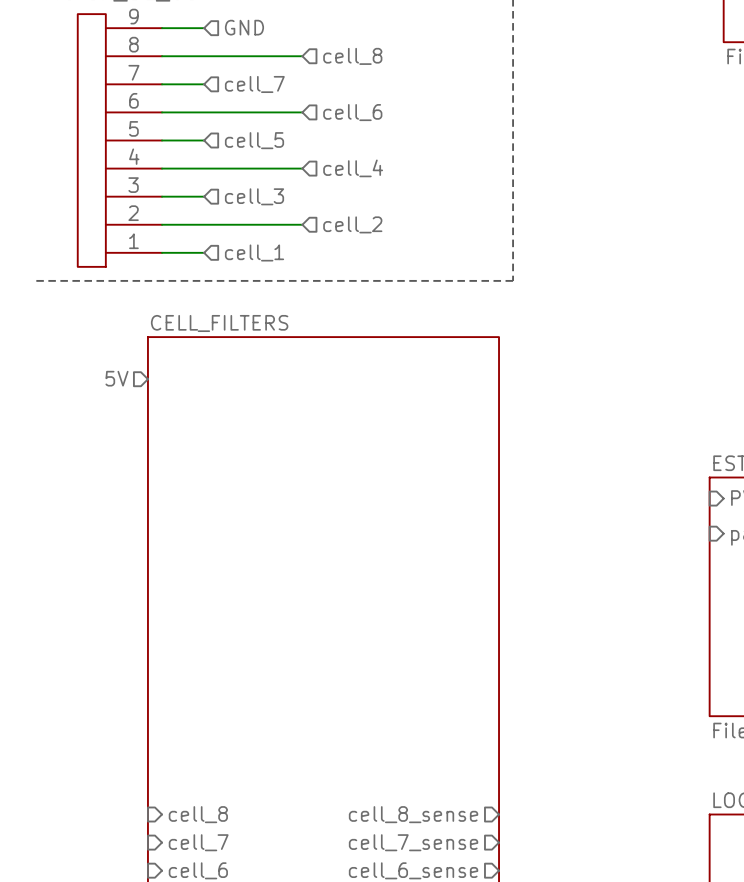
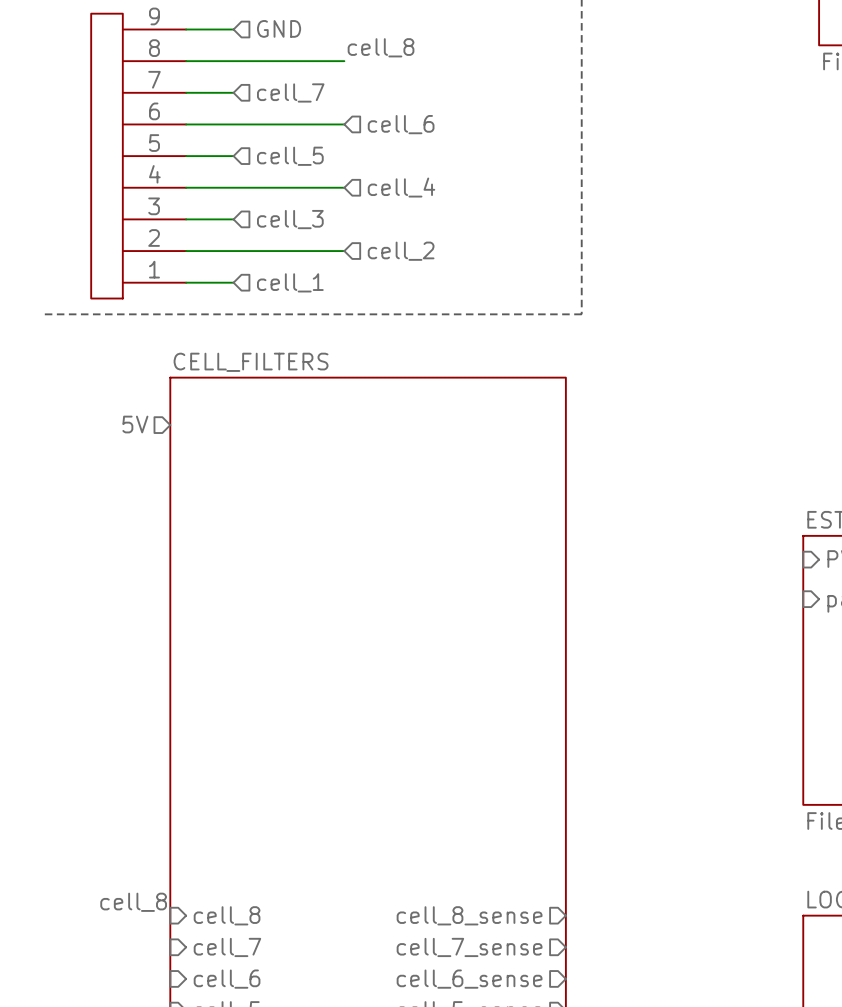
label: none -> cell_8 (381, 47)
hierarchical label: cell_8 (352, 56) -> none
label: none -> cell_8 (133, 902)

